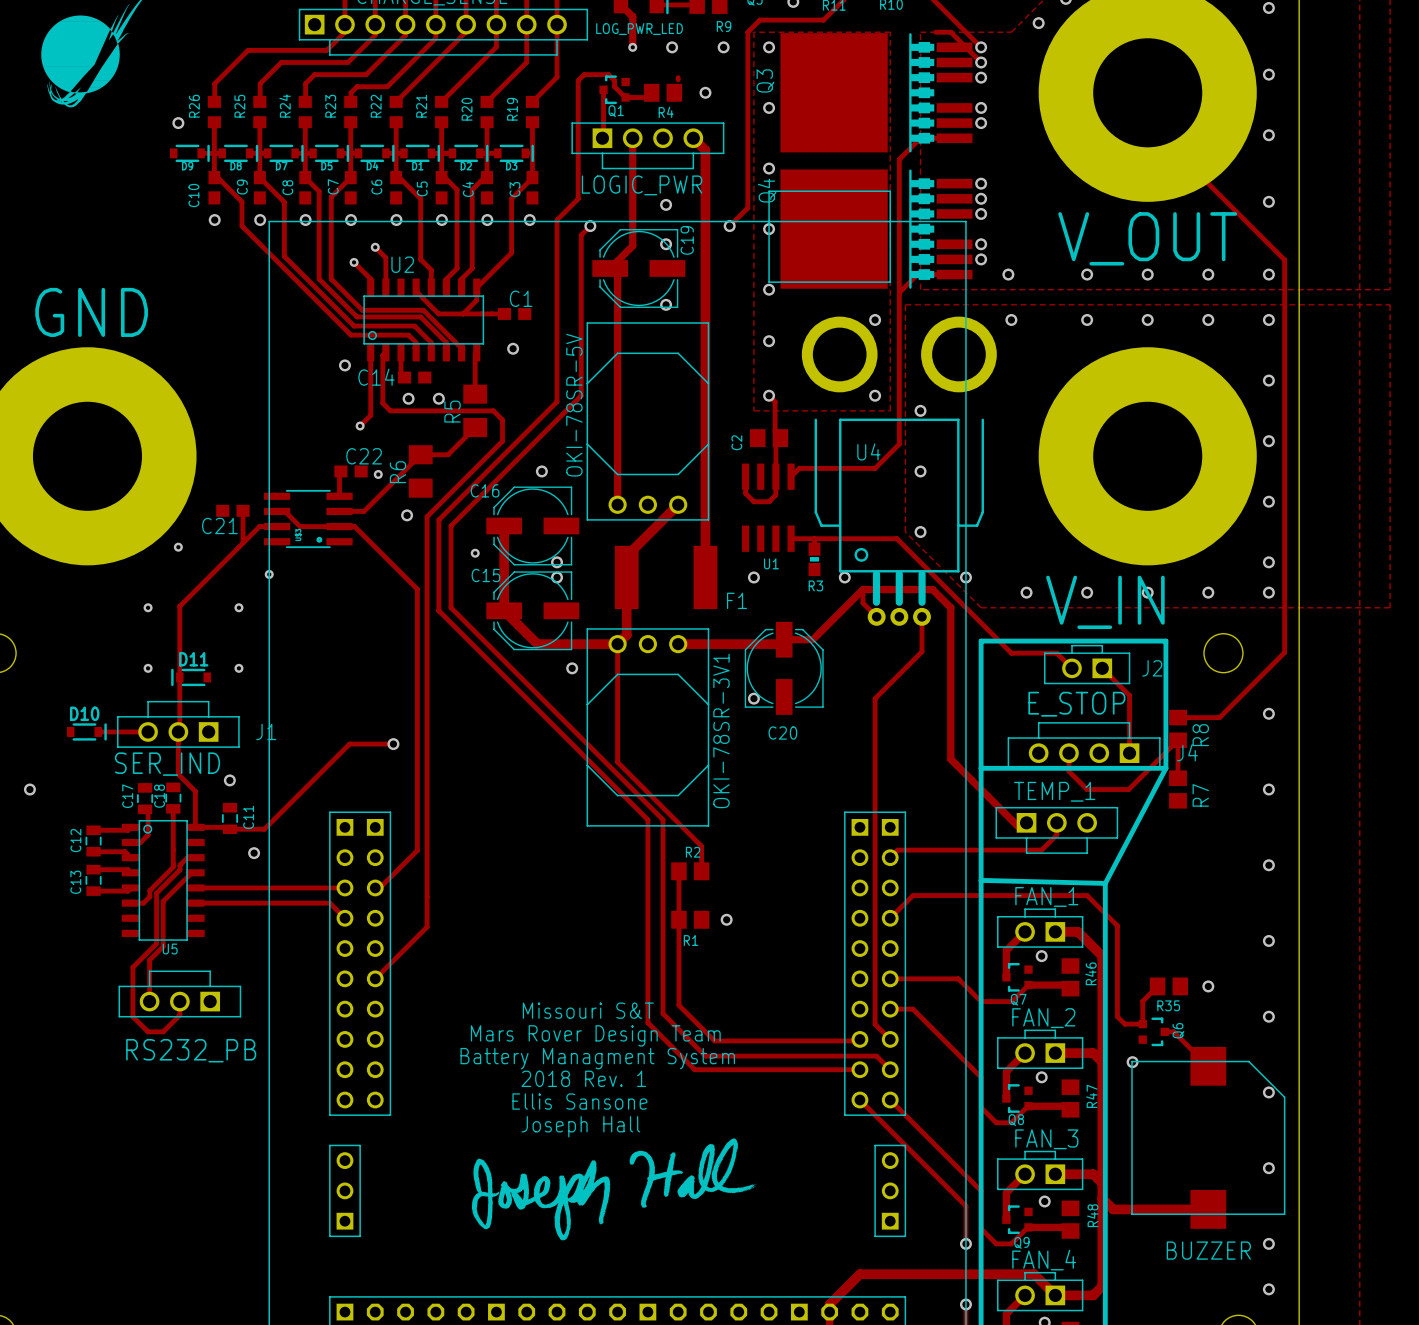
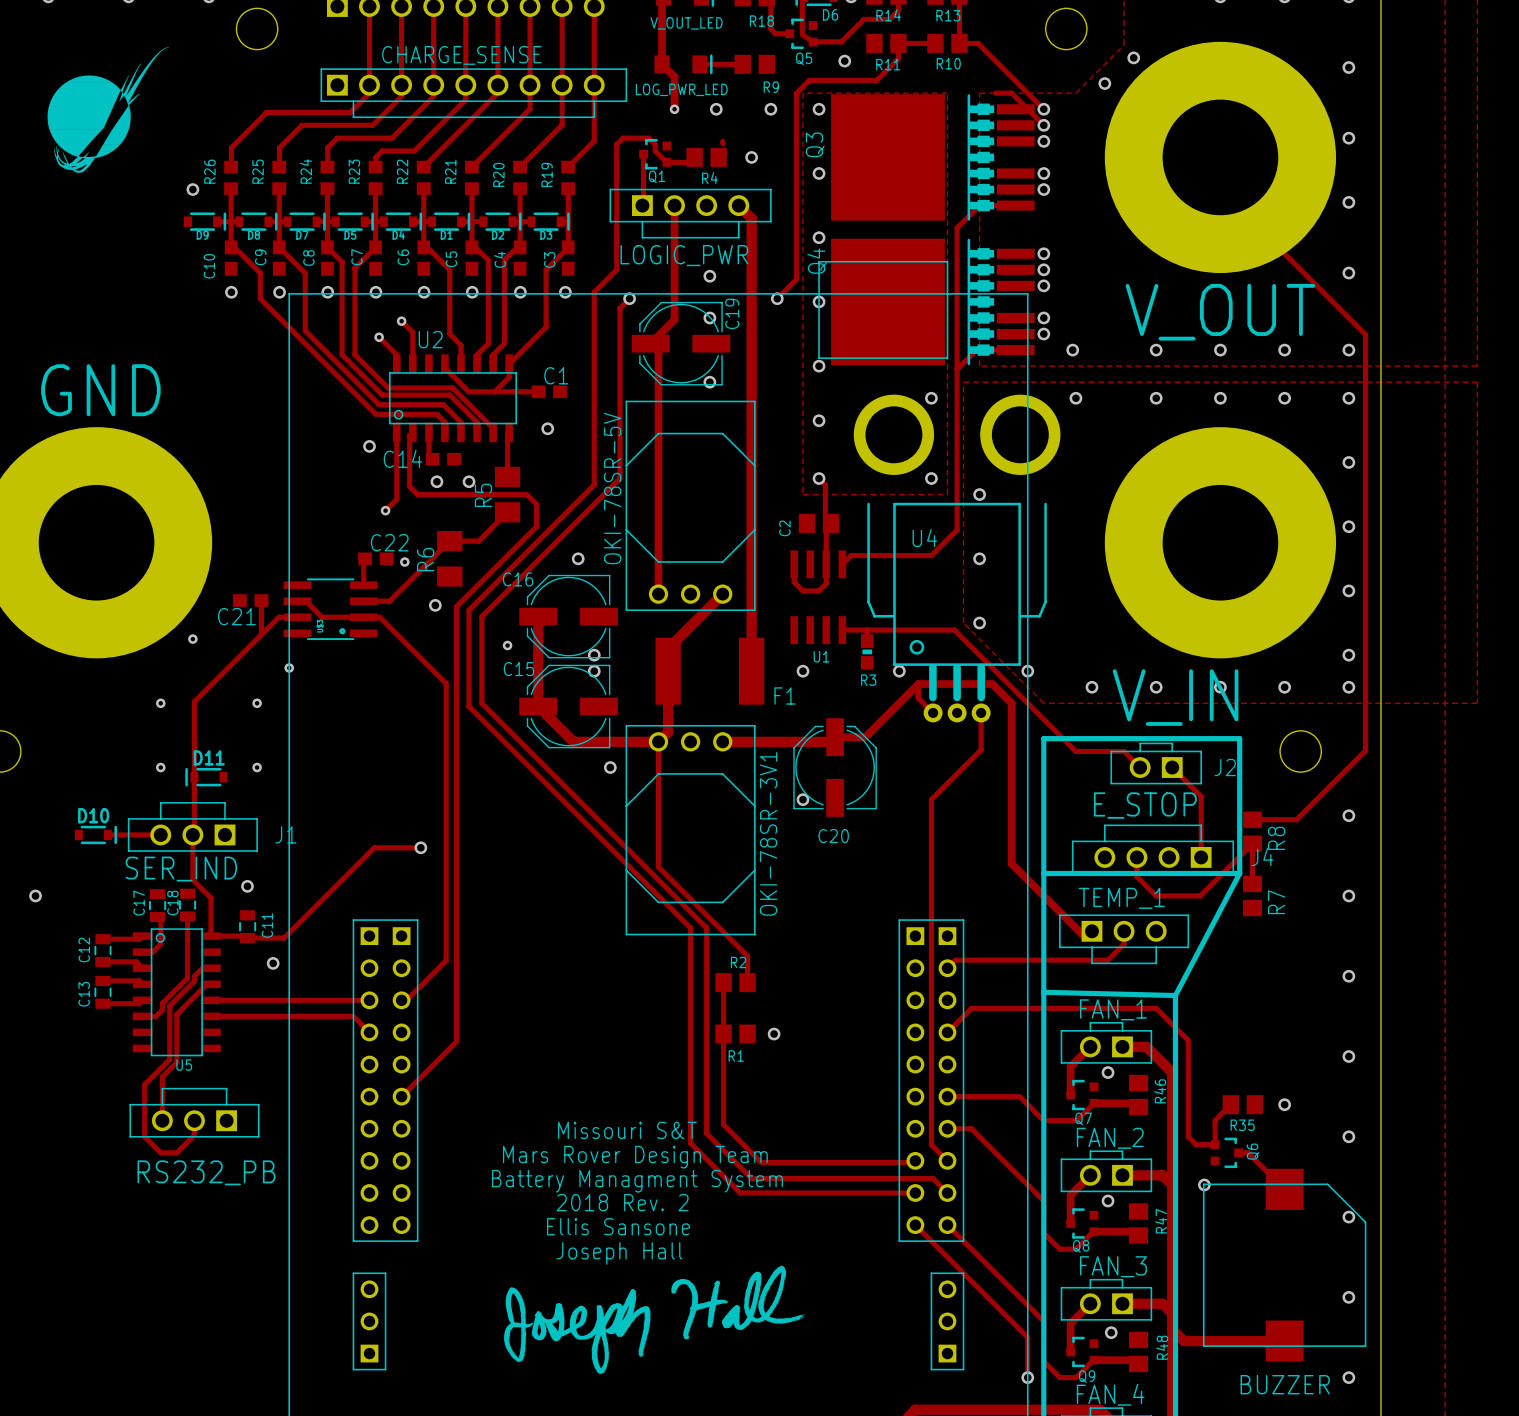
text: 2018 Rev. 1 (583, 1078) -> 2018 Rev. 2 (622, 1202)

